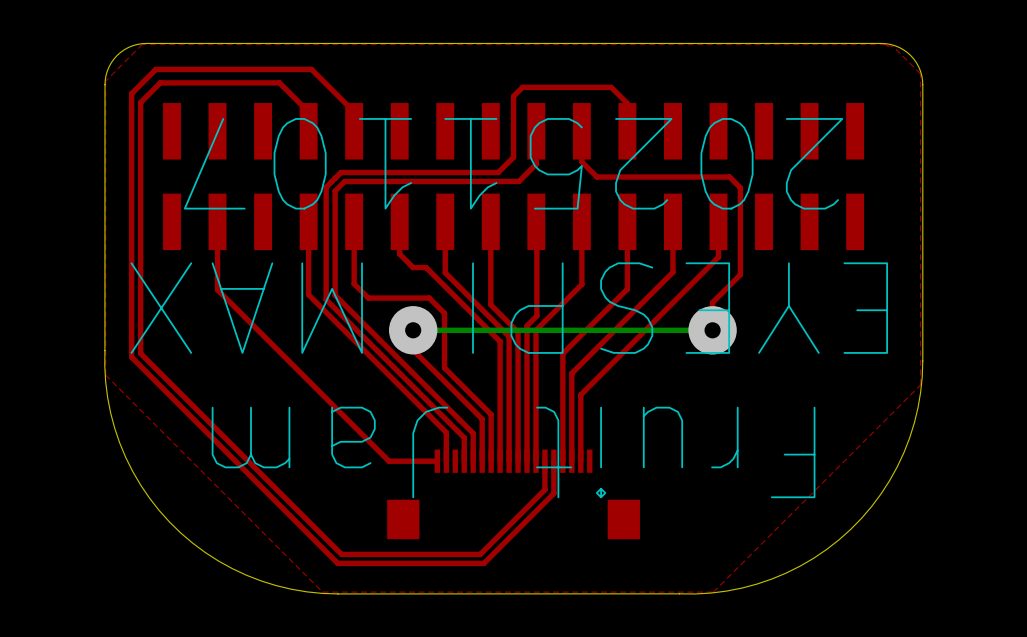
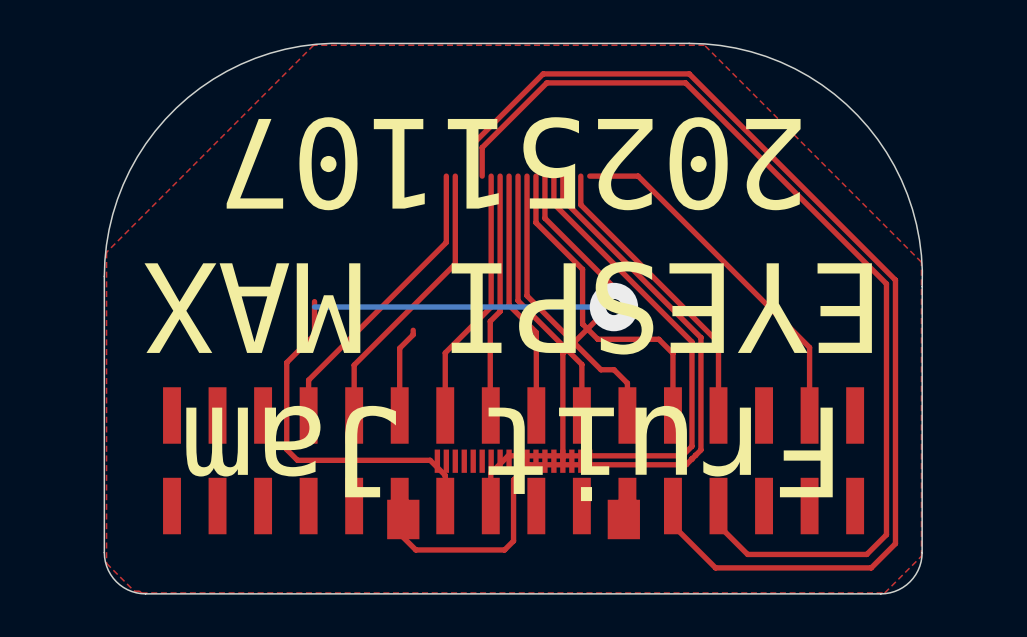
top zone outline: (885, 44) (142, 44) (105, 81) (105, 375) (322, 592) (713, 592) (920, 385) (920, 73) (892, 46) (885, 44) -> (704, 45) (921, 262) (921, 556) (884, 592) (141, 592) (134, 591) (106, 563) (106, 252) (313, 45) (704, 45)
top track: (308, 131) (308, 112) (279, 82) (160, 82) (140, 102) (140, 353) (341, 554) (480, 554) (544, 489) (544, 461) -> none
top track: (354, 131) (354, 112) (311, 69) (155, 69) (131, 93) (131, 357) (337, 563) (483, 563) (553, 493) (553, 461) -> none
top track: (536, 131) (536, 164) (518, 181) (344, 181) (335, 191) (335, 295) (473, 433) (473, 461) -> none
top track: (581, 131) (581, 161) (596, 177) (729, 177) (740, 187) (740, 274) (712, 302) (712, 335) -> none
top track: (627, 131) (627, 103) (611, 87) (522, 87) (513, 96) (513, 157) (498, 172) (340, 172) (326, 187) (326, 299) (464, 437) (464, 461) -> none
top track: none -> (446, 176) (446, 242) (308, 380) (308, 415)
top track: none -> (455, 176) (455, 263) (354, 365) (354, 415)
top track: none -> (473, 176) (473, 143) (543, 73) (689, 73) (895, 280) (895, 543) (871, 567) (715, 567) (672, 525) (672, 506)
top track: none -> (482, 176) (482, 147) (546, 82) (685, 82) (886, 283) (886, 534) (866, 554) (747, 554) (718, 525) (718, 506)
top track: none -> (491, 176) (491, 307) (445, 352) (445, 415)
top track: none -> (500, 176) (500, 311) (490, 321) (490, 415)
top track: none -> (509, 176) (509, 305) (536, 332) (536, 415)
part position: (513, 176) -> (513, 460)
top track: none -> (518, 176) (518, 300) (581, 364) (581, 415)
top track: none -> (527, 176) (527, 295) (600, 369) (613, 369) (627, 383) (627, 415)
top track: none -> (535, 176) (535, 222) (582, 269) (582, 324) (597, 339) (658, 339) (672, 353) (672, 415)
top track: none -> (553, 176) (553, 203) (691, 341) (691, 446) (682, 455) (508, 455) (490, 473) (490, 506)
top track: none -> (562, 176) (562, 199) (700, 337) (700, 449) (686, 464) (528, 464) (513, 480) (513, 541) (504, 549) (415, 549) (399, 533) (399, 506)
top track: none -> (580, 176) (580, 204) (718, 342) (718, 415)
top track: none -> (589, 176) (638, 176) (809, 347) (809, 415)
top track: (217, 221) (217, 289) (388, 461) (437, 461) -> none
top track: (308, 221) (308, 294) (446, 432) (446, 461) -> none
top track: (354, 221) (354, 283) (368, 298) (429, 298) (444, 313) (444, 367) (491, 414) (491, 461) -> none
top track: (399, 221) (399, 254) (413, 267) (426, 267) (500, 341) (500, 461) -> none
top track: (445, 221) (445, 272) (509, 336) (509, 461) -> none
top track: (490, 221) (490, 304) (518, 332) (518, 461) -> none
top track: (536, 221) (536, 315) (527, 325) (527, 461) -> none
top track: (581, 221) (581, 284) (535, 330) (535, 461) -> none
top track: (627, 221) (627, 289) (620, 296) -> (544, 176) (544, 218) (620, 293) (620, 296)
top track: (672, 221) (672, 272) (571, 373) (571, 461) -> none
top track: (718, 221) (718, 257) (580, 394) (580, 461) -> none
board edge: (922, 286) (922, 80) (918, 66) (910, 55) (903, 49) (890, 44) (146, 43) (132, 45) (120, 52) (111, 62) (106, 75) (104, 366) (107, 397) (114, 428) (125, 457) (140, 485) (169, 522) (192, 543) (218, 561) (261, 580) (291, 589) (338, 593) (695, 593) (726, 591) (756, 584) (786, 573) (826, 549) (850, 529) (871, 506) (889, 480) (909, 437) (918, 407) (922, 361) -> (922, 286) (921, 255) (912, 209) (894, 165) (877, 139) (857, 115) (834, 94) (808, 76) (766, 56) (735, 48) (689, 43) (331, 43) (300, 46) (270, 53) (226, 71) (200, 87) (176, 108) (155, 131) (137, 156) (117, 199) (109, 229) (104, 276) (105, 561) (110, 574) (119, 584) (131, 591) (145, 593) (890, 592) (902, 587) (913, 578) (919, 566) (921, 557) (922, 361)
top track: none -> (314, 301) (314, 334) (286, 362) (286, 449) (297, 460) (430, 460) (445, 475) (445, 506)
via: none -> (613, 307)
via: (413, 330) -> none
bottom track: (712, 330) (413, 330) -> (613, 307) (314, 307)
via: (712, 330) -> none
top track: (406, 341) (406, 343) (482, 419) (482, 461) -> (406, 341) (399, 348) (399, 415)

